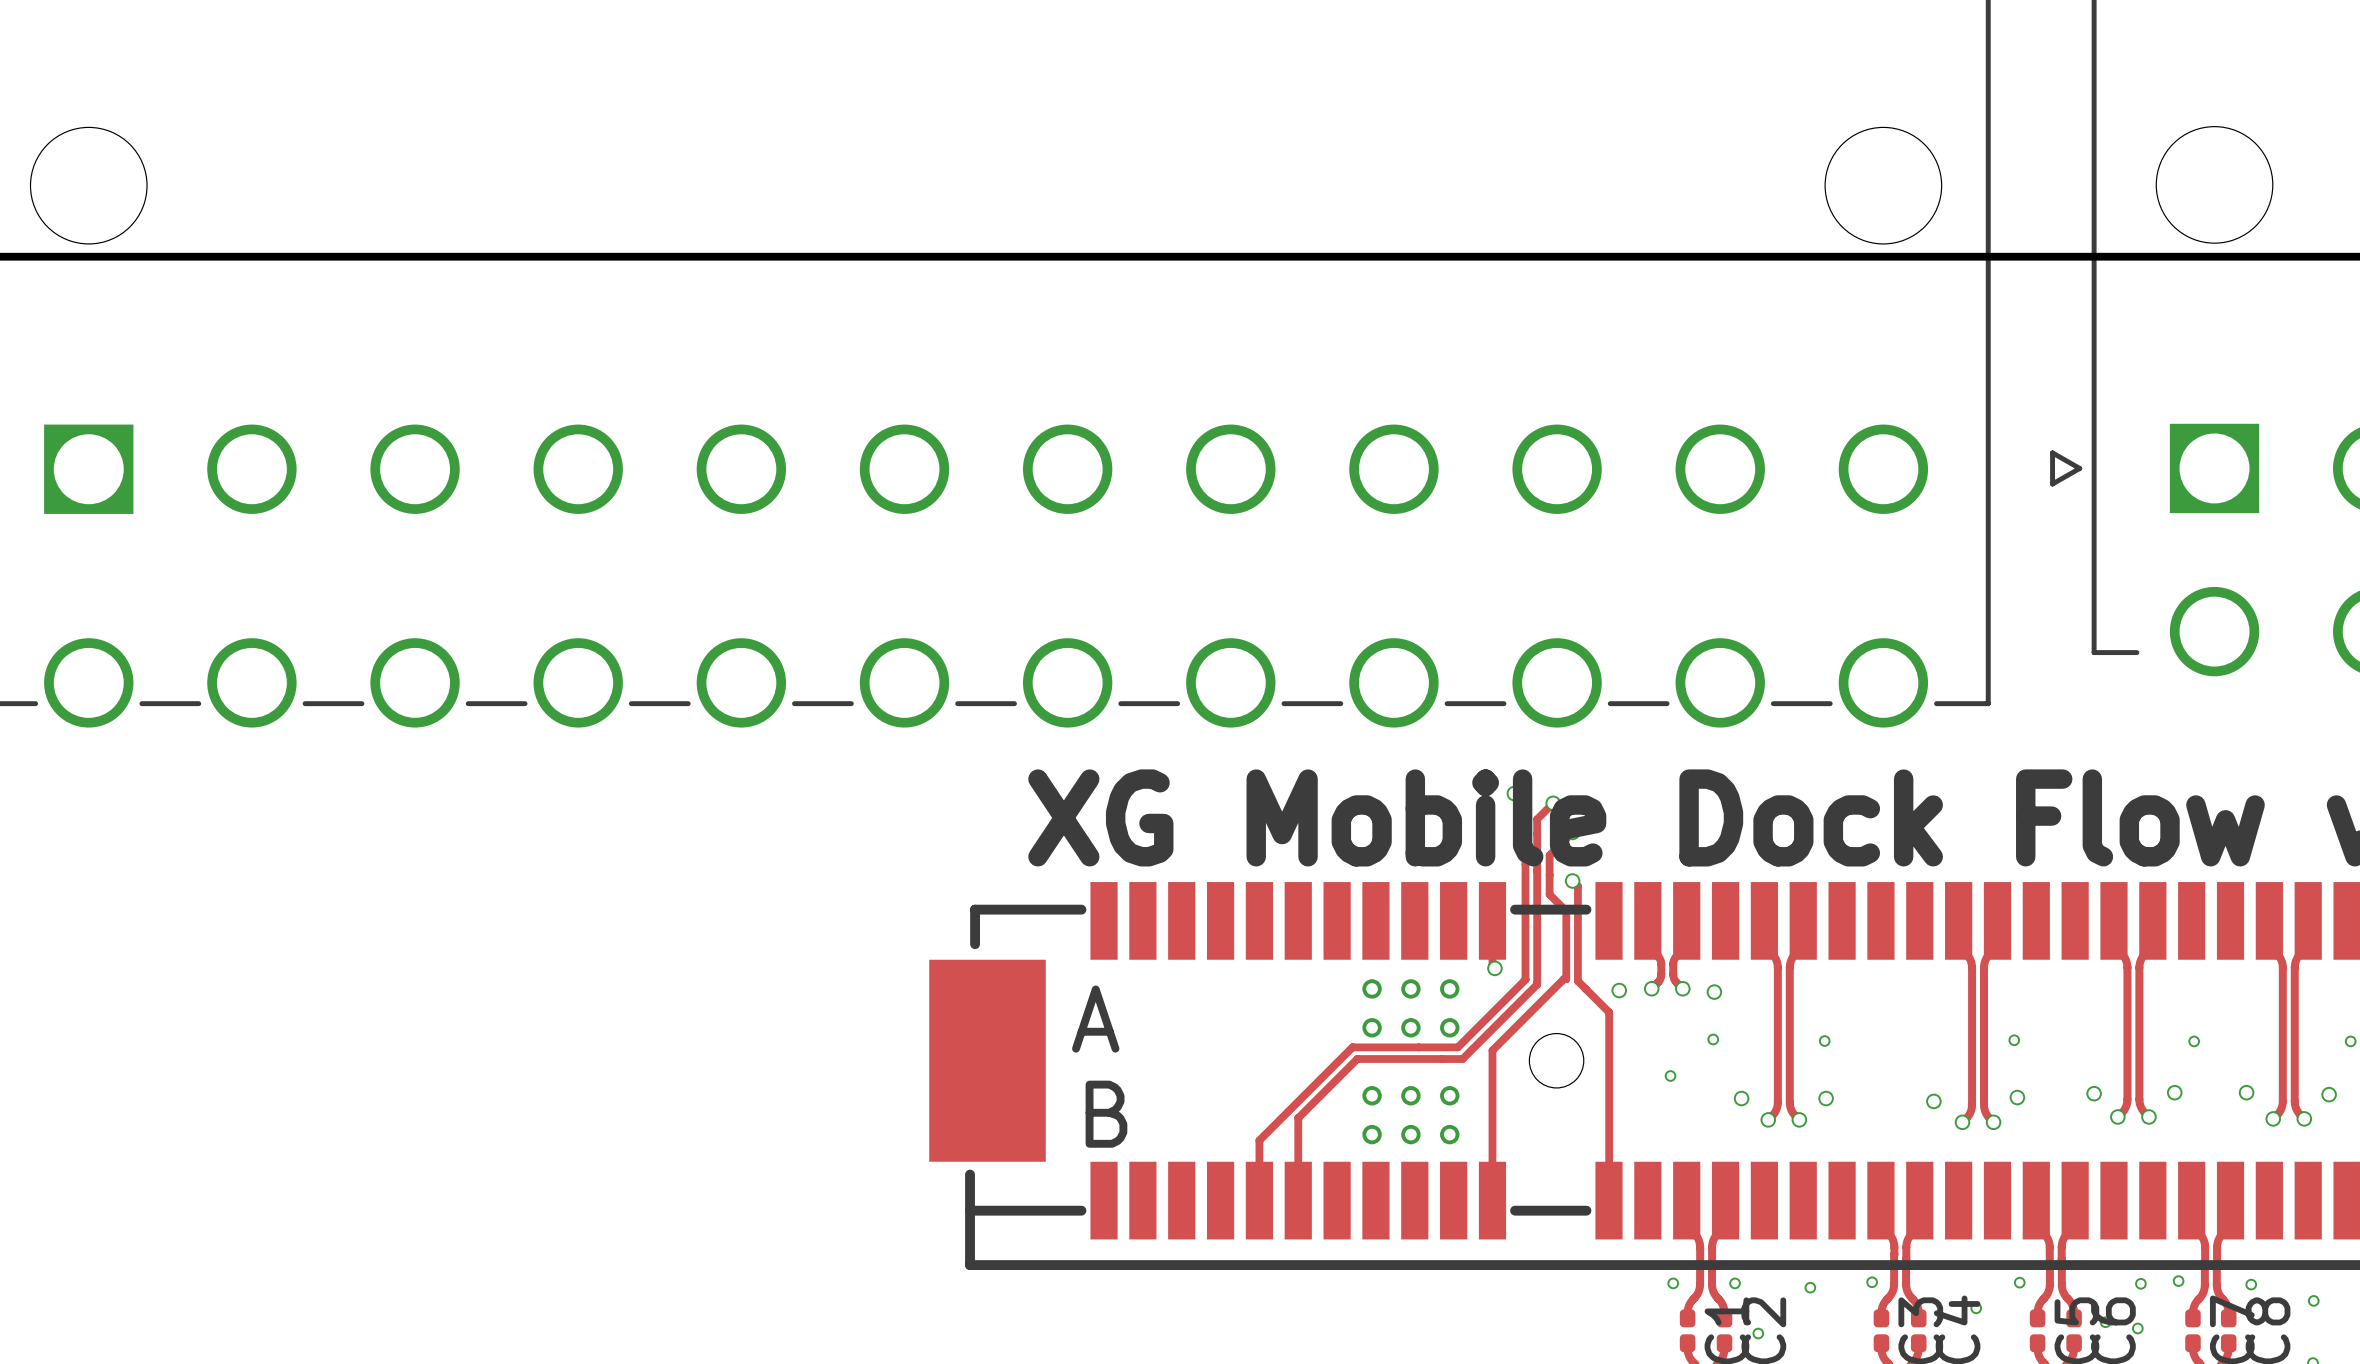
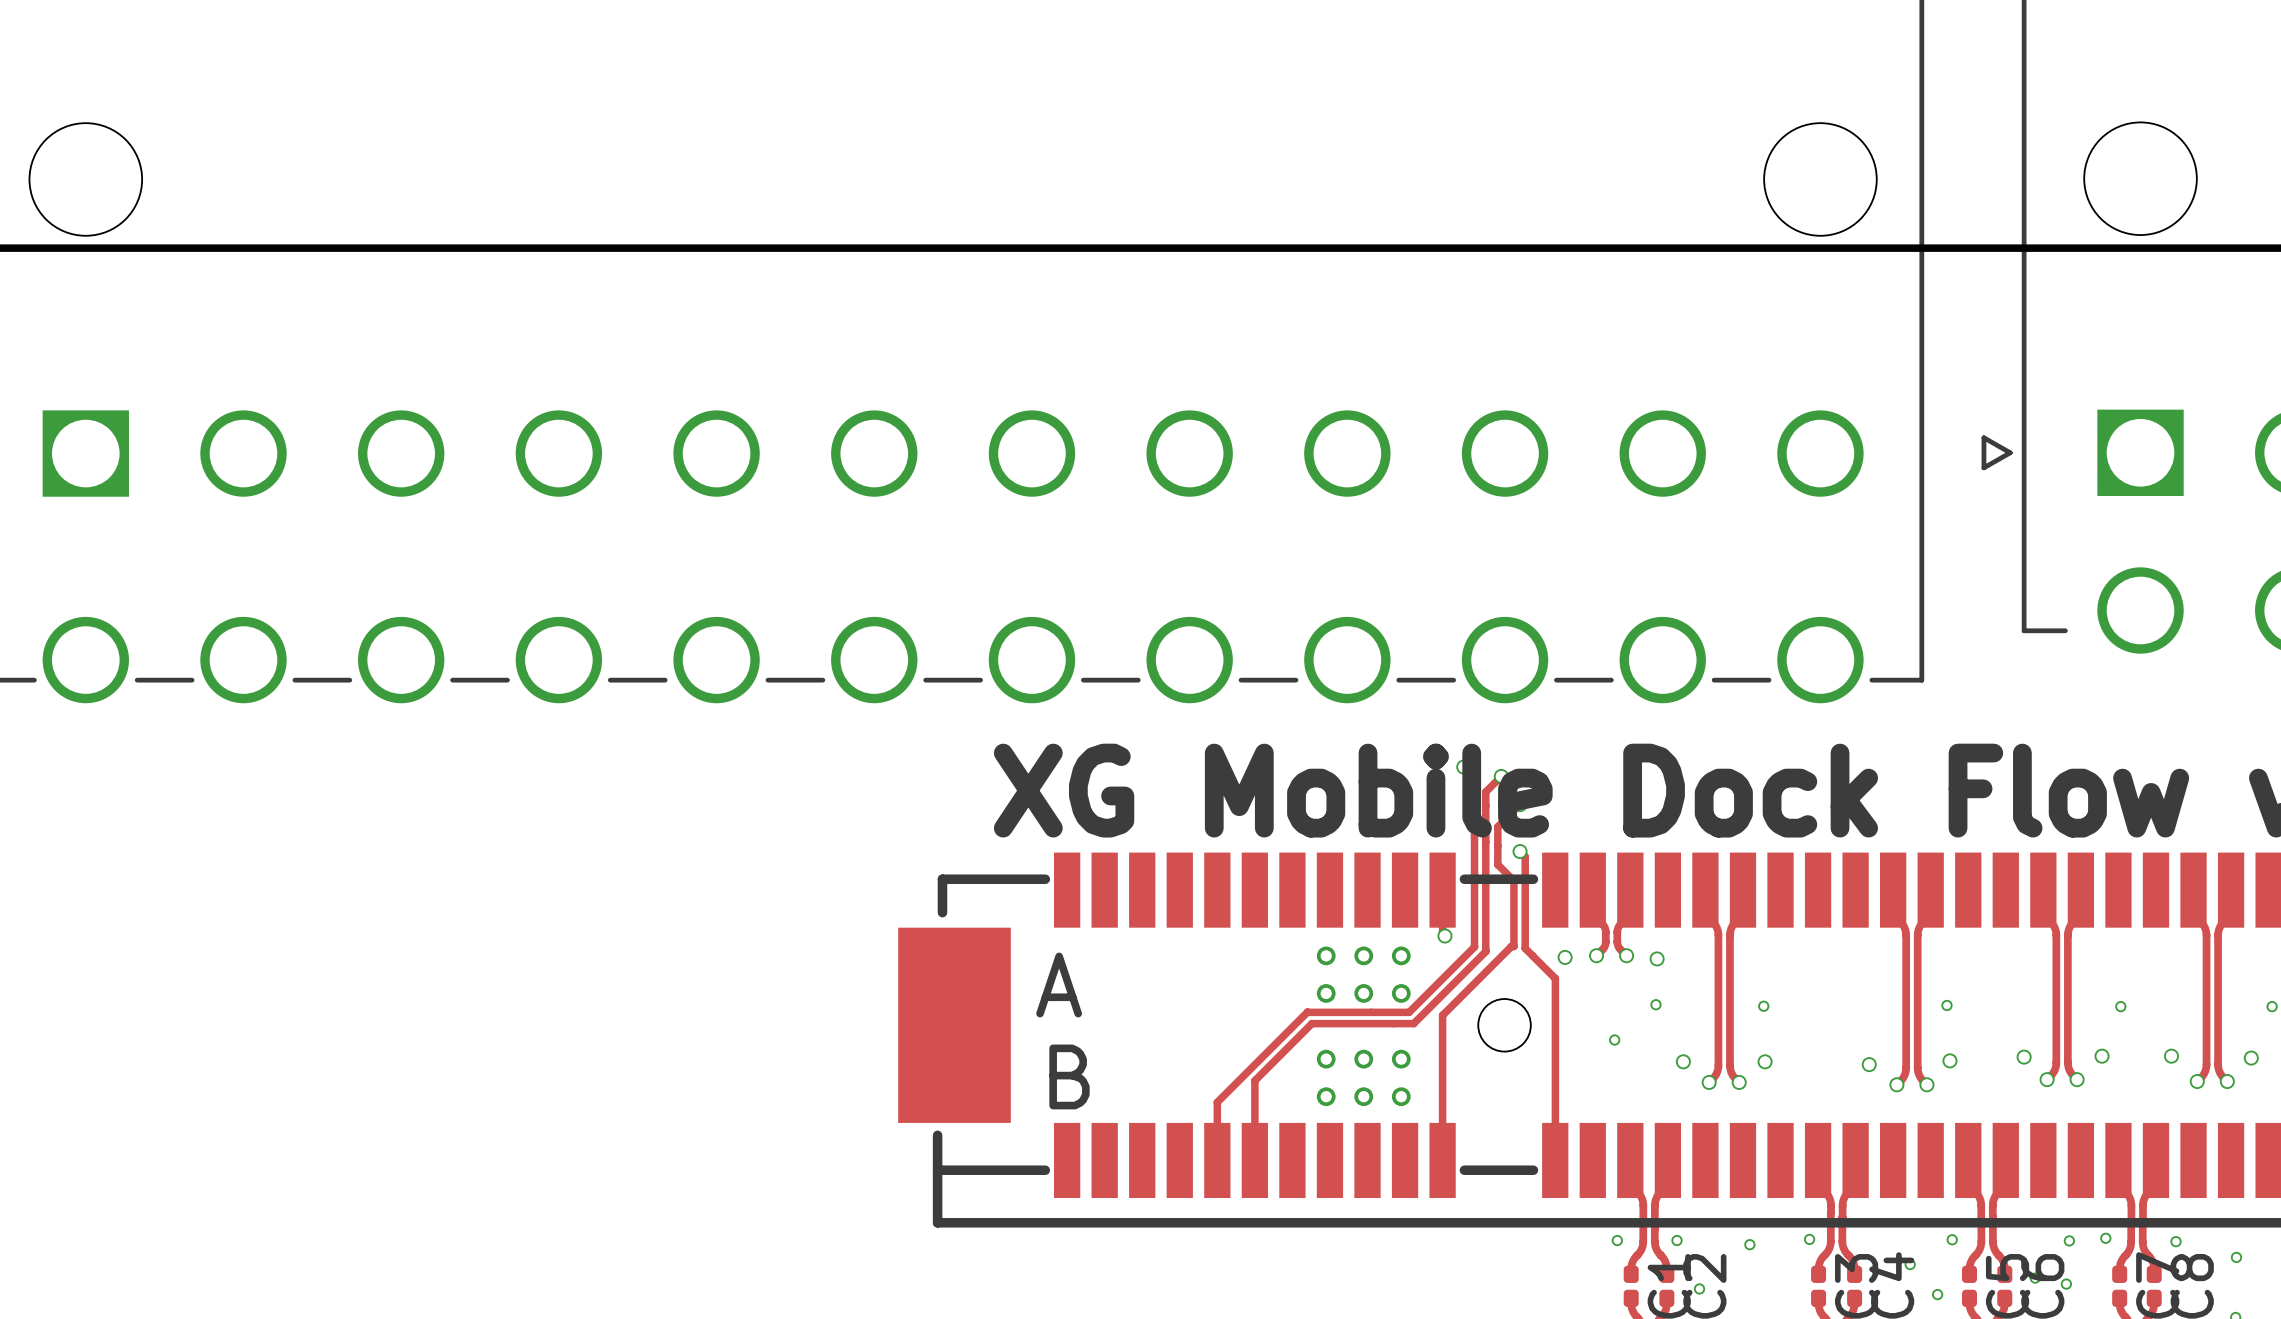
via: none -> (1937, 1294)

